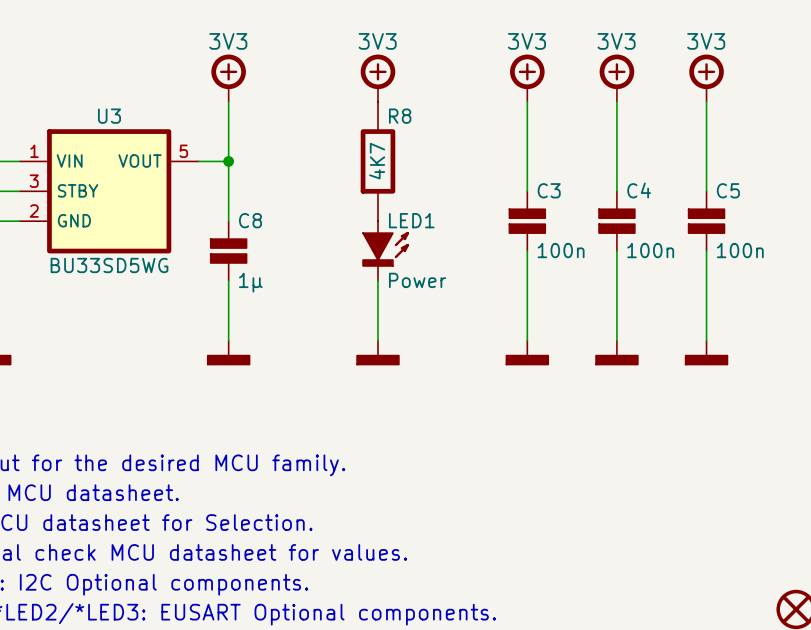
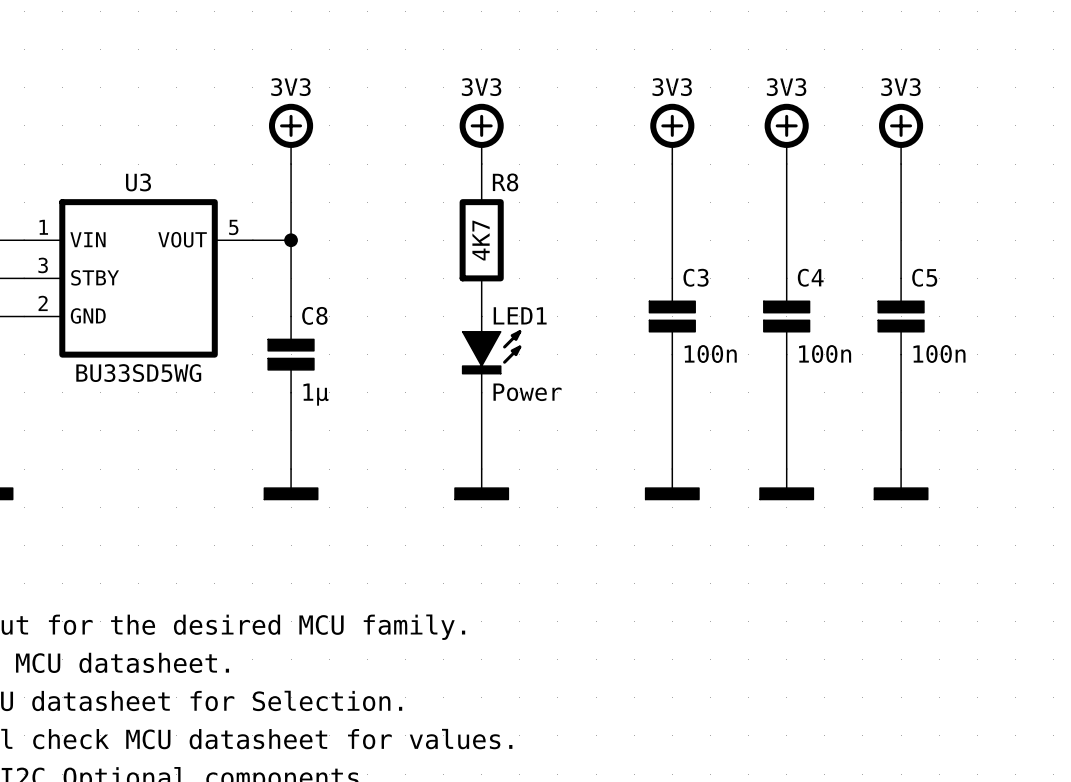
power symbol text: 3V3 (228, 41) -> none
power symbol text: none -> 3V3 (290, 87)
power symbol text: 3V3 (377, 41) -> none
power symbol text: none -> 3V3 (481, 87)
power symbol text: 3V3 (526, 41) -> none
power symbol text: none -> 3V3 (672, 87)
power symbol text: 3V3 (616, 41) -> none
power symbol text: none -> 3V3 (786, 87)
power symbol text: 3V3 (706, 41) -> none
power symbol text: none -> 3V3 (900, 87)

